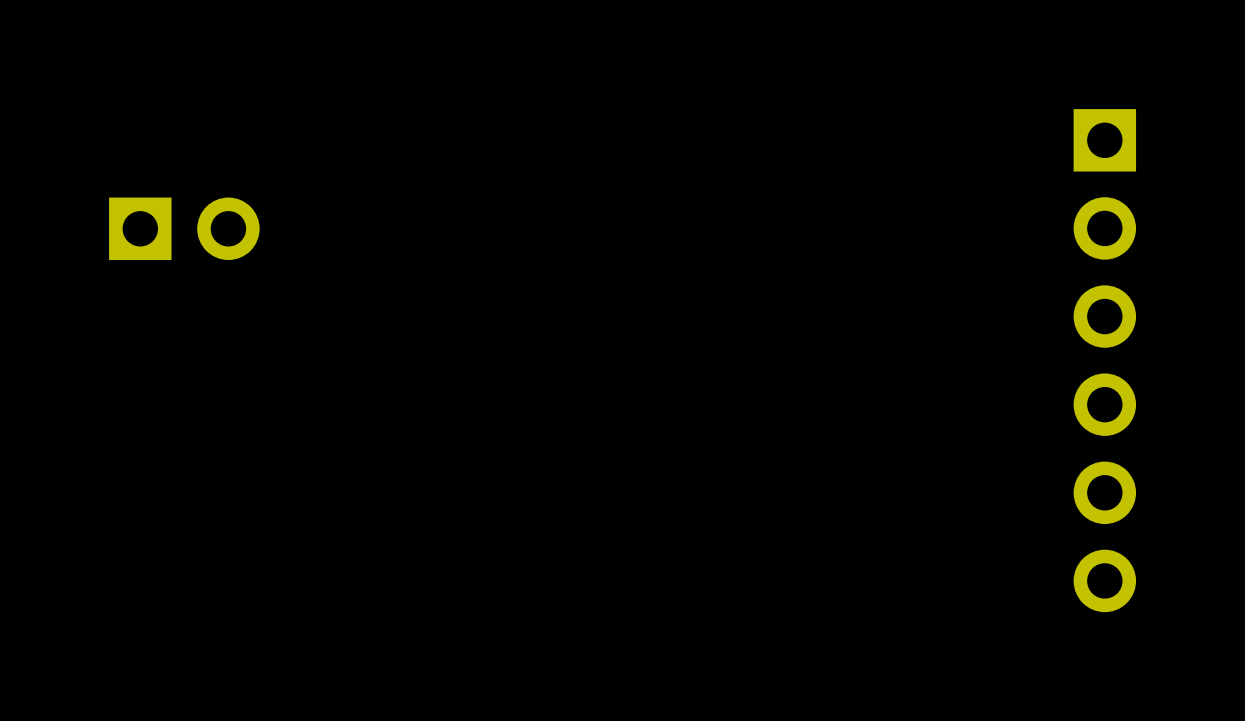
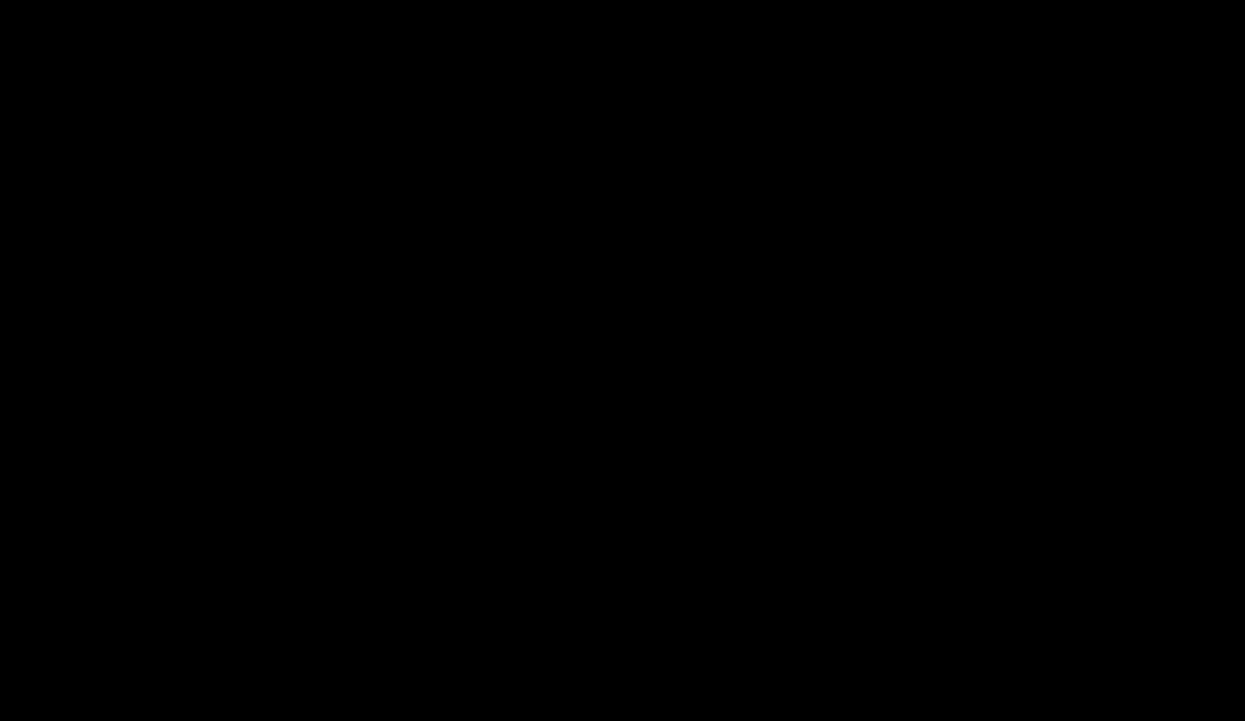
part: (184, 228) -> none
part: (1104, 360) -> none

